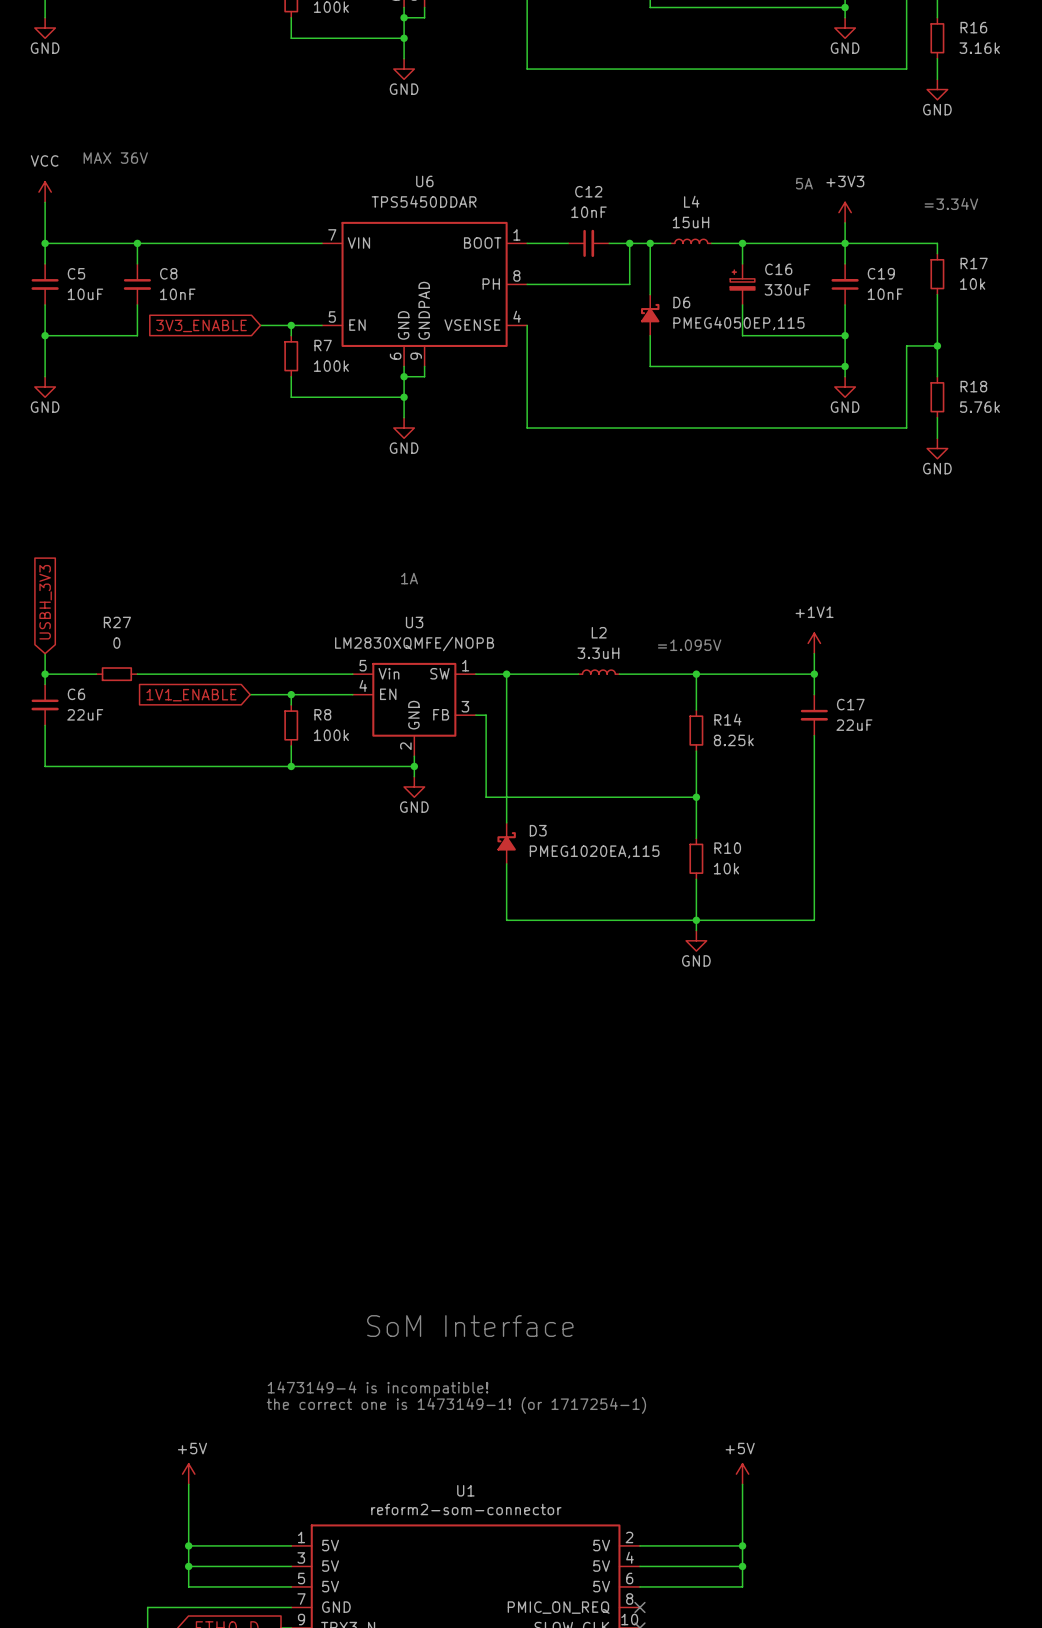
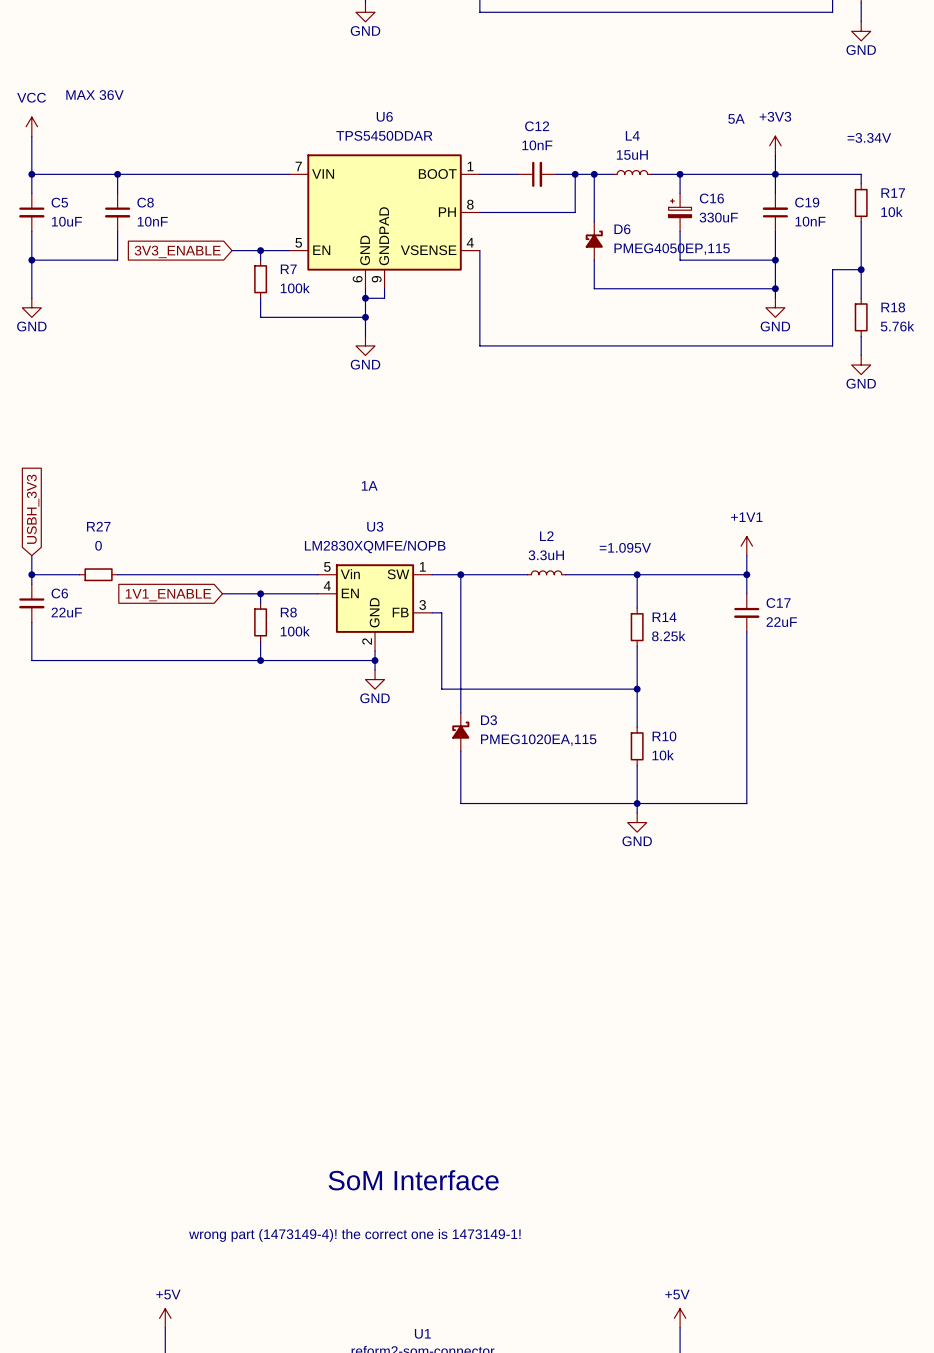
text: none -> wrong part (1473149-4)! the correct one is 1473149-1! (354, 1235)
text: 1473149-4 is incompatible! (378, 1389) -> none
text: the correct one is 1473149-1! (or 1717254-1) (456, 1405) -> none

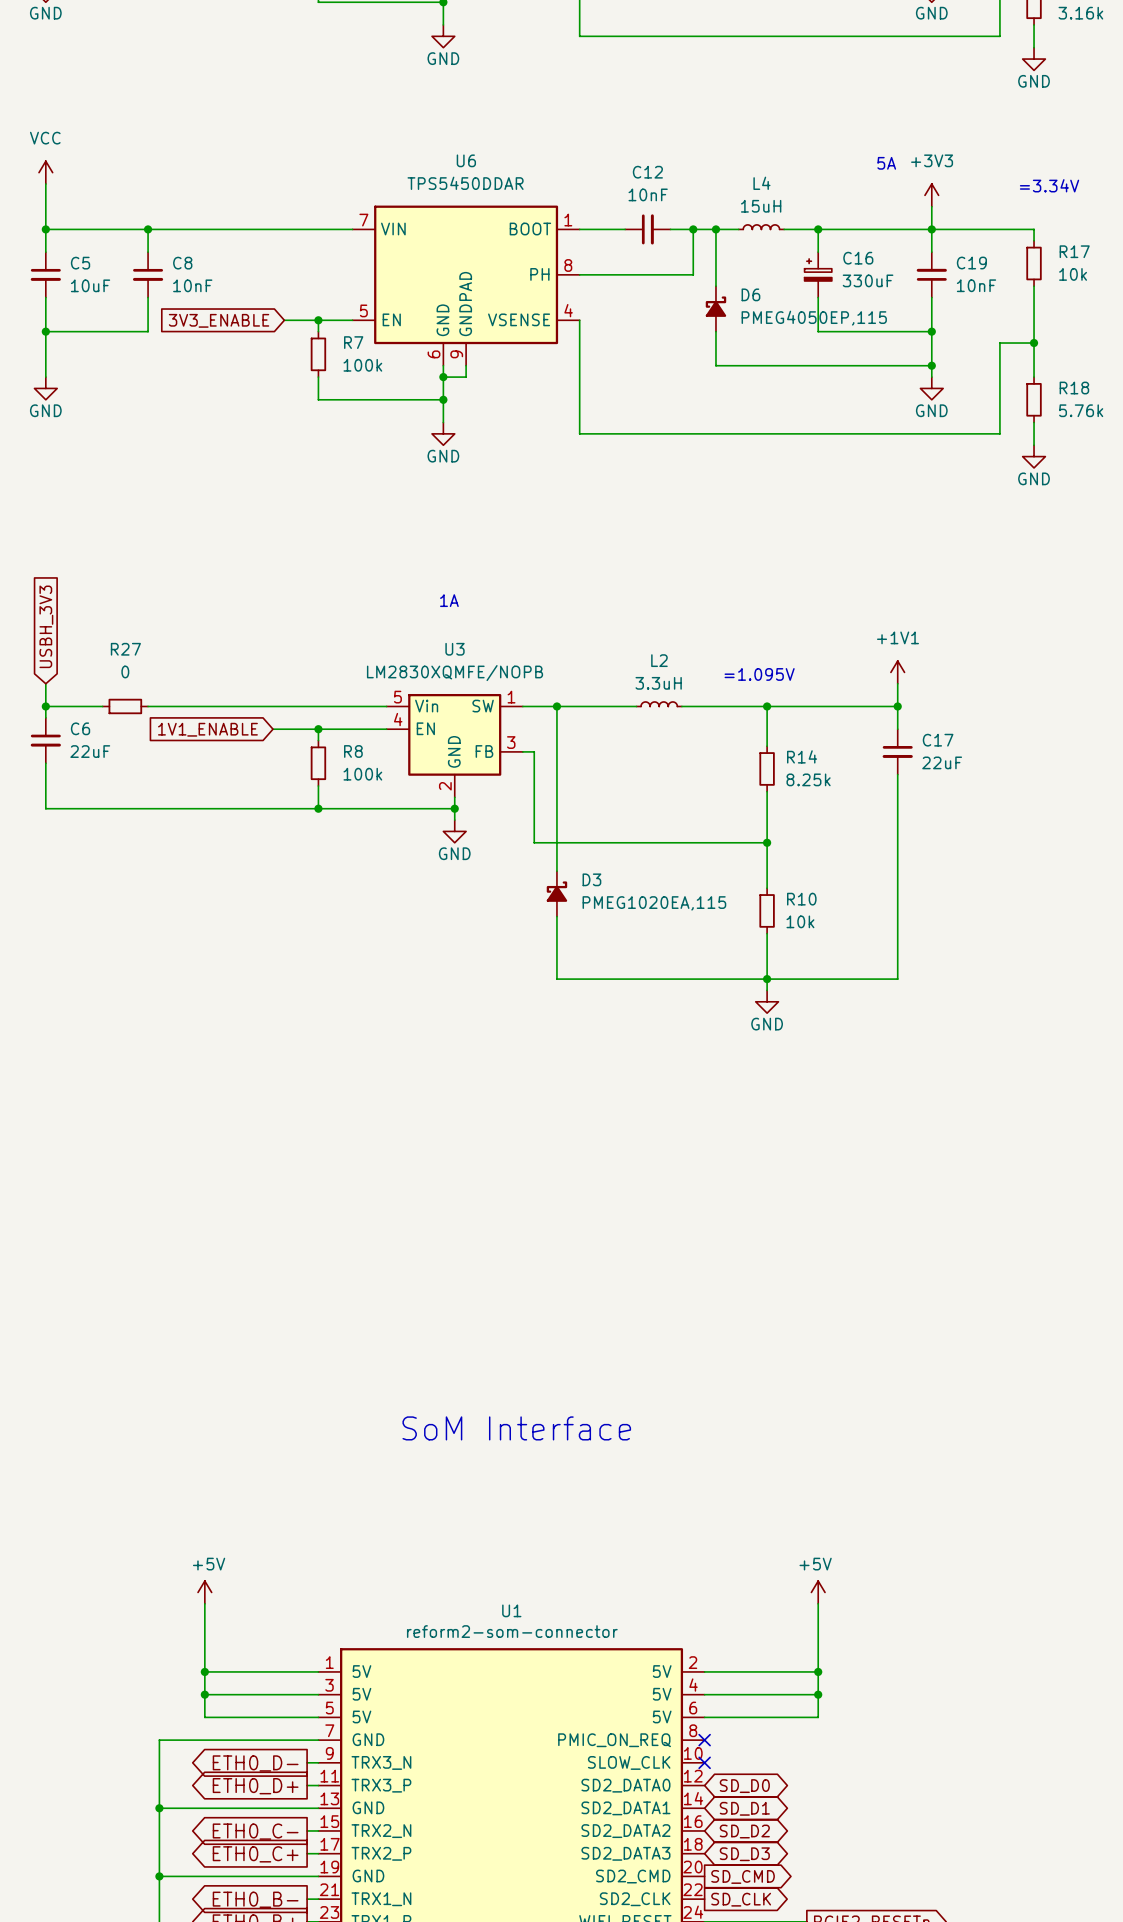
text: MAX 36V (94, 95) -> none
text: wrong part (1473149-4)! the correct one is 1473149-1! (354, 1235) -> none

